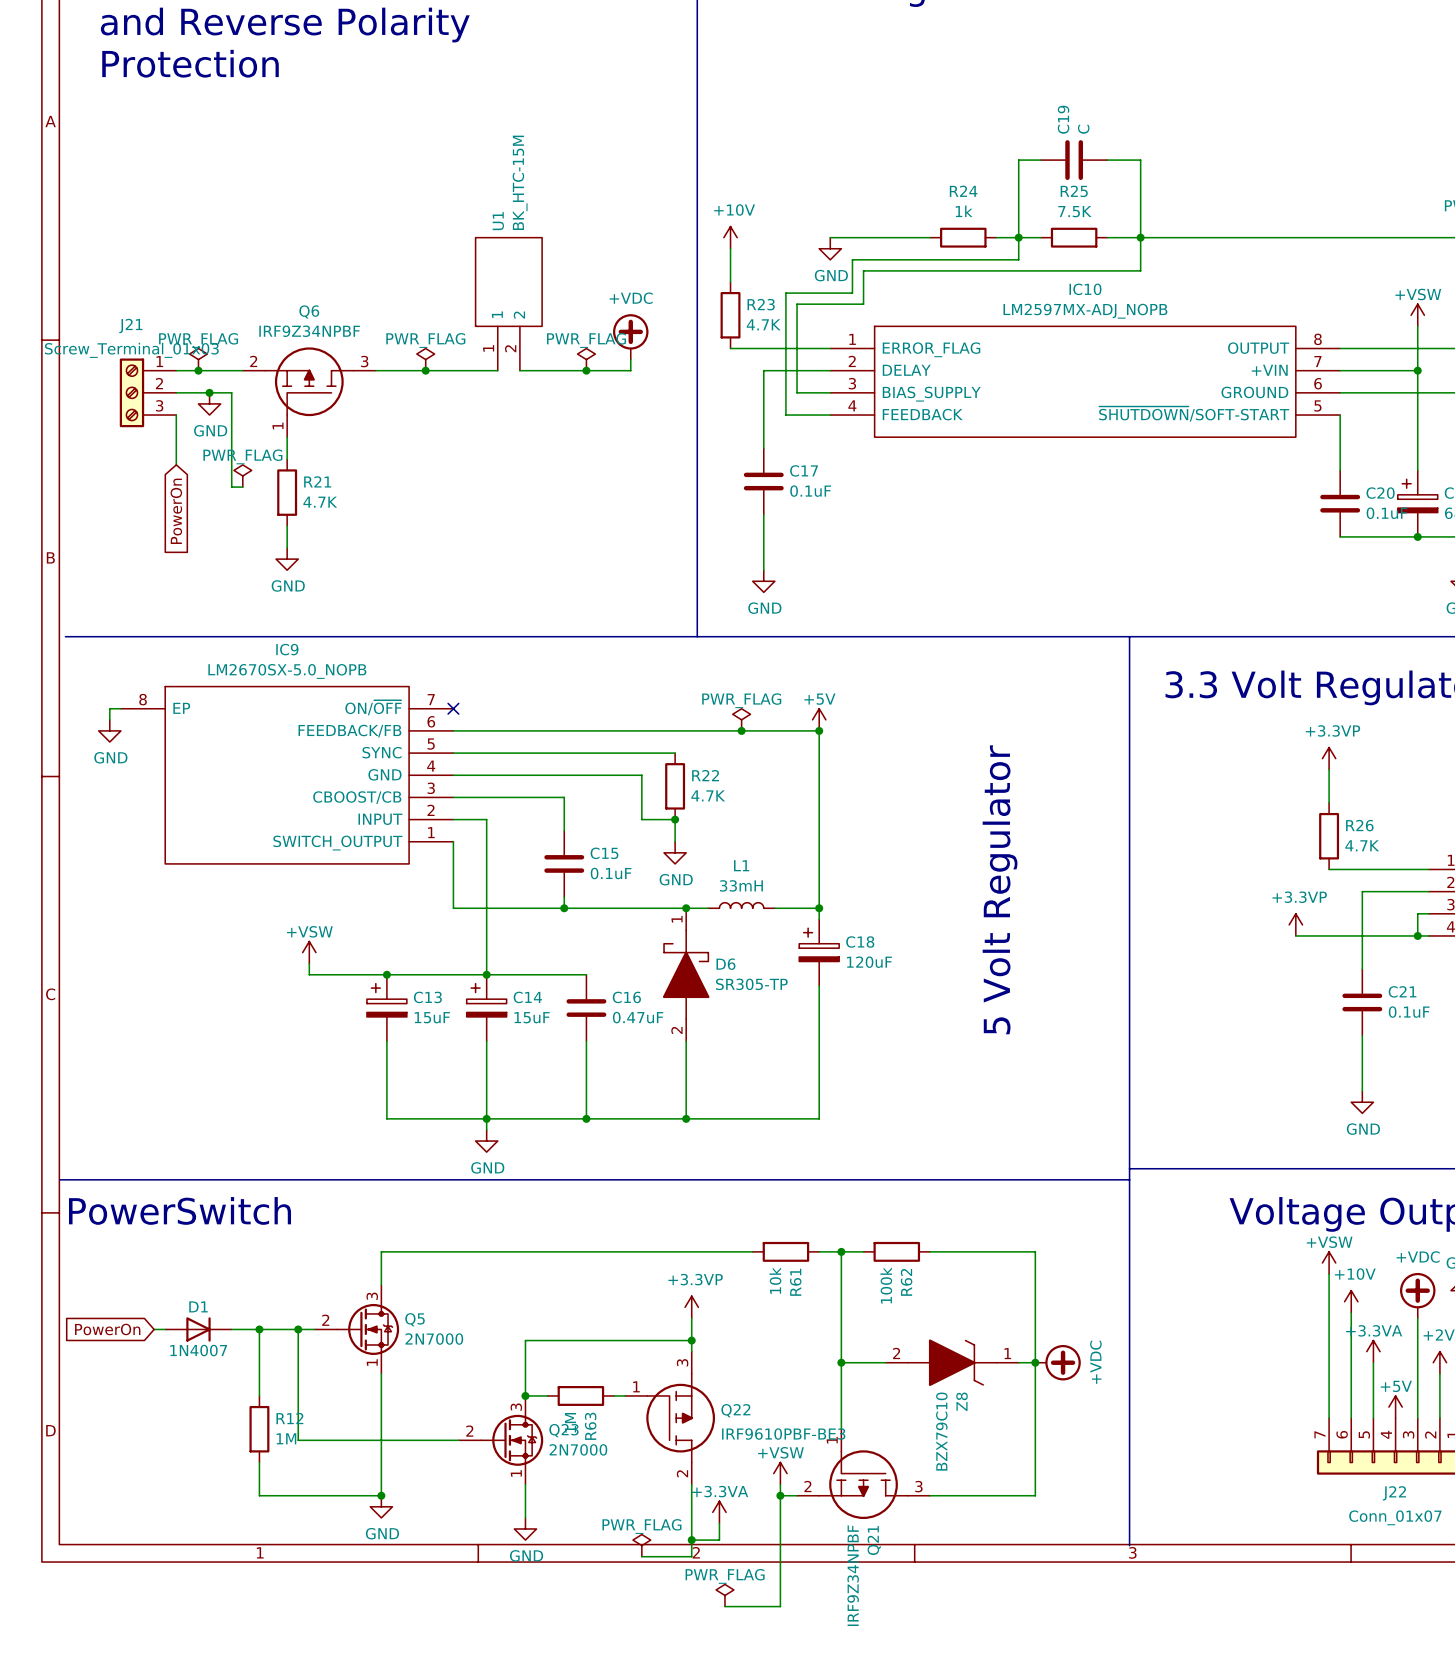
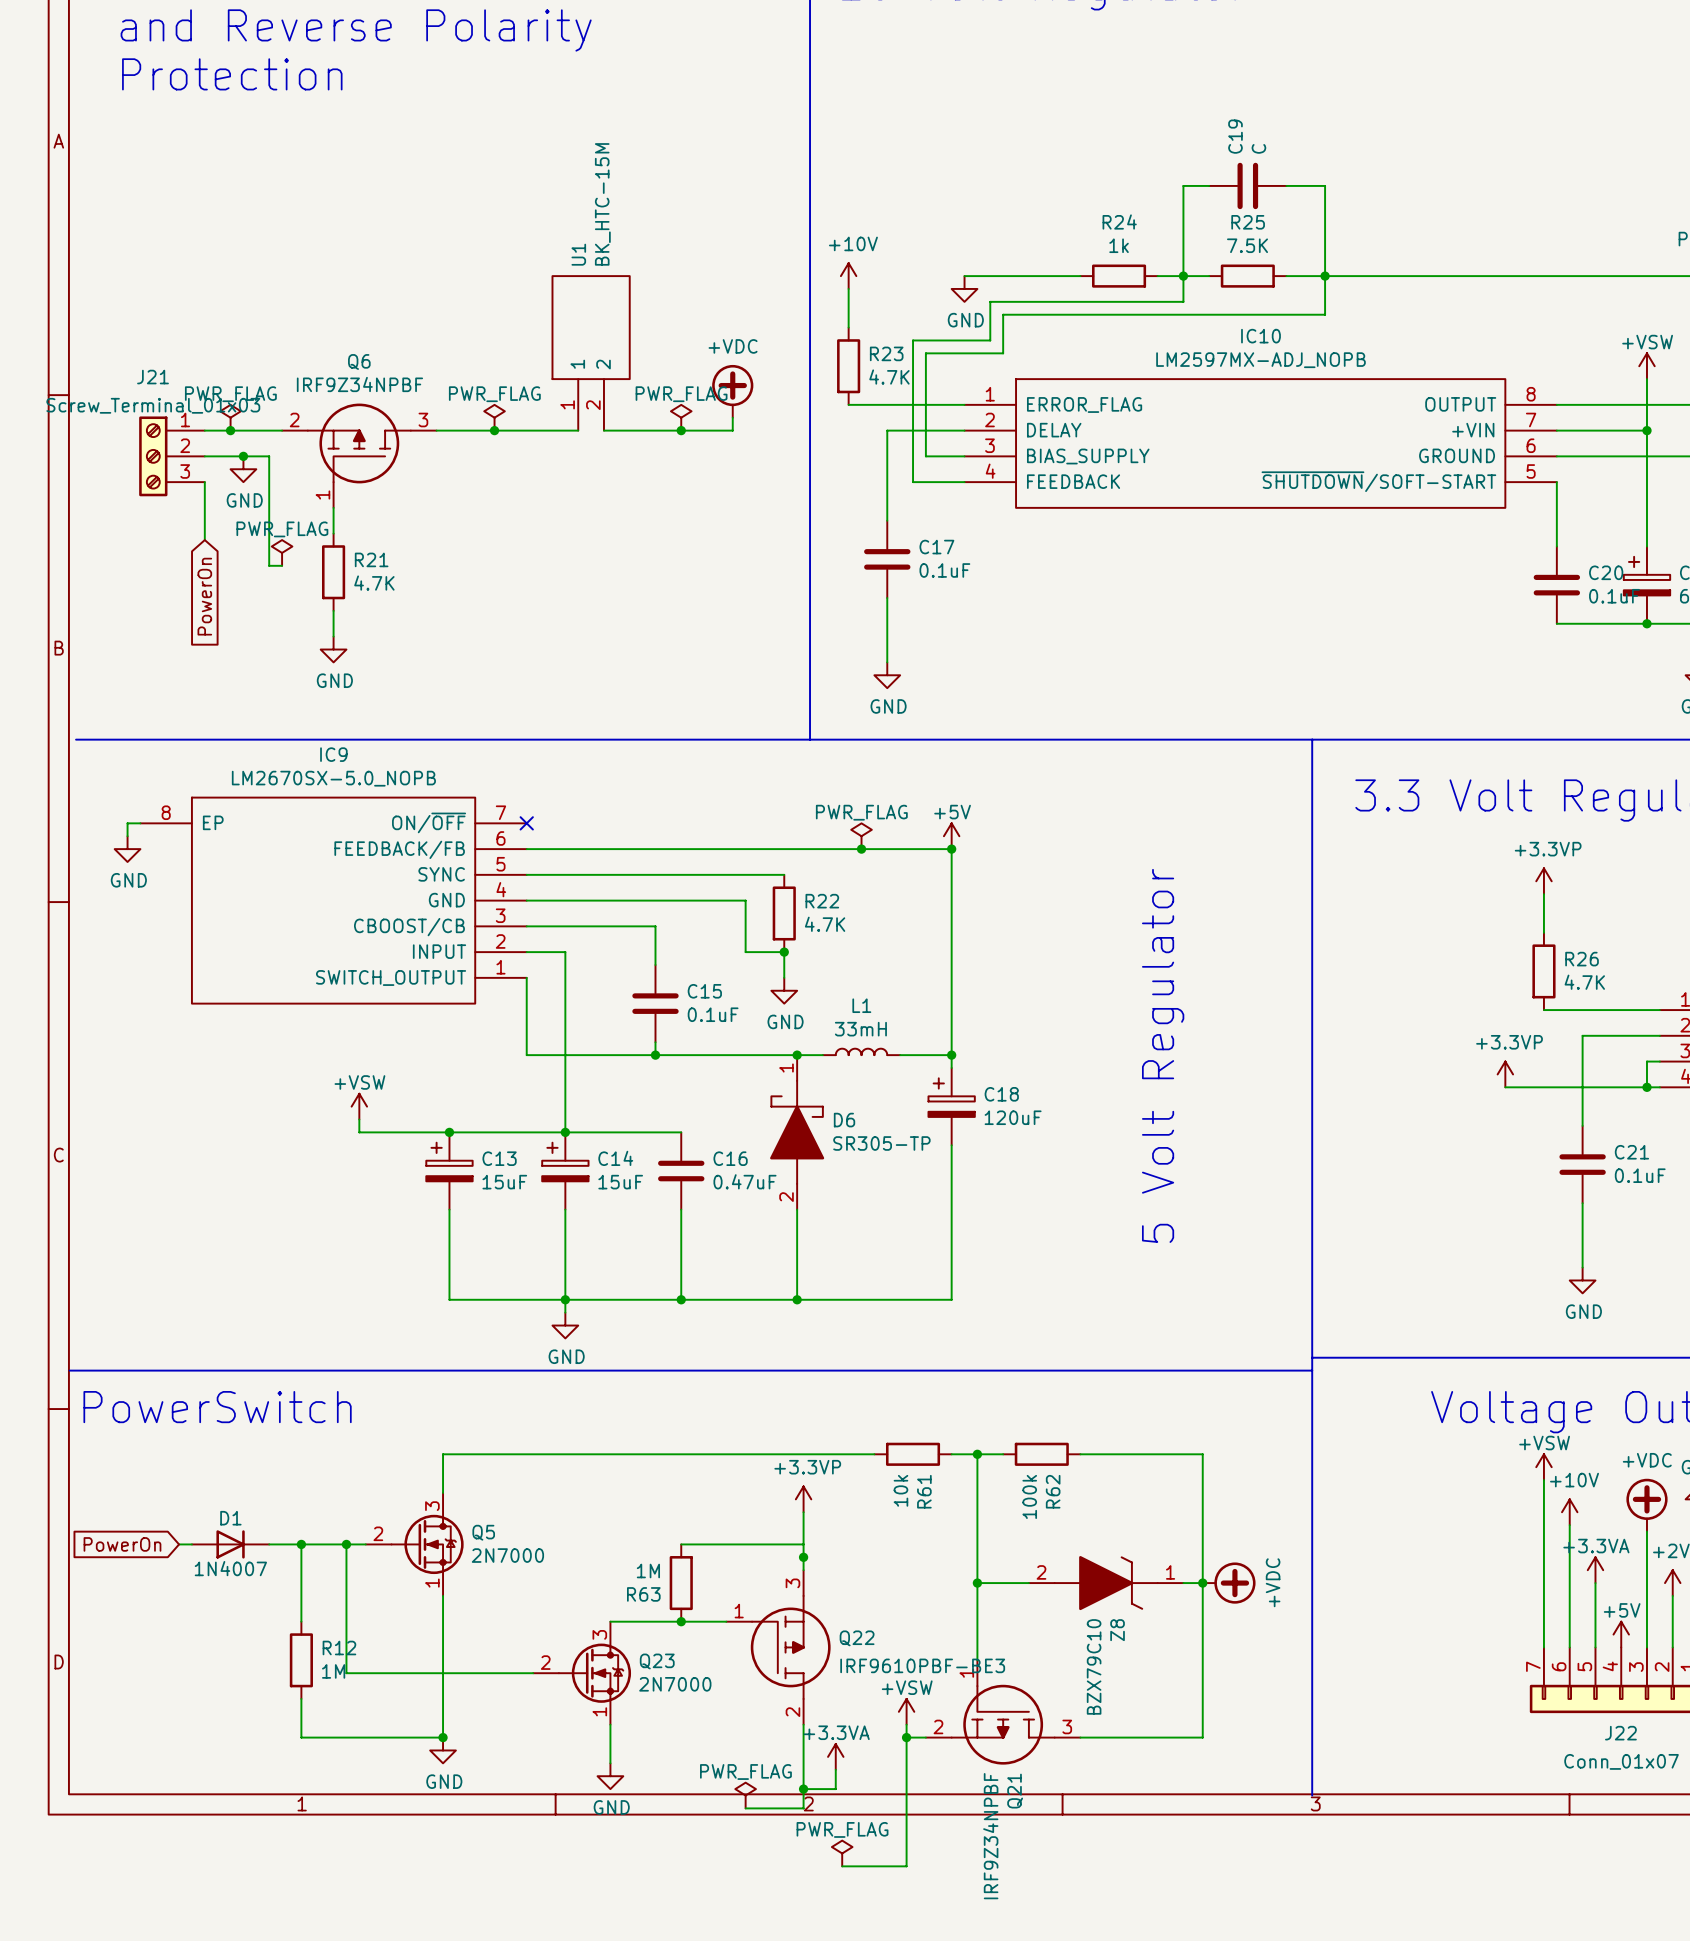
power symbol position: +3.3VP (691, 1307) -> +3.3VP (803, 1499)
wire: none -> (681, 1544) (803, 1544)
wire: (691, 1340) (525, 1340) (525, 1395) -> none
junction: (525, 1395) -> none
wire: none -> (636, 1621) (713, 1621)
R63 rotation: 0° (580, 1395) -> 90° clockwise (681, 1583)
junction: none -> (681, 1621)

